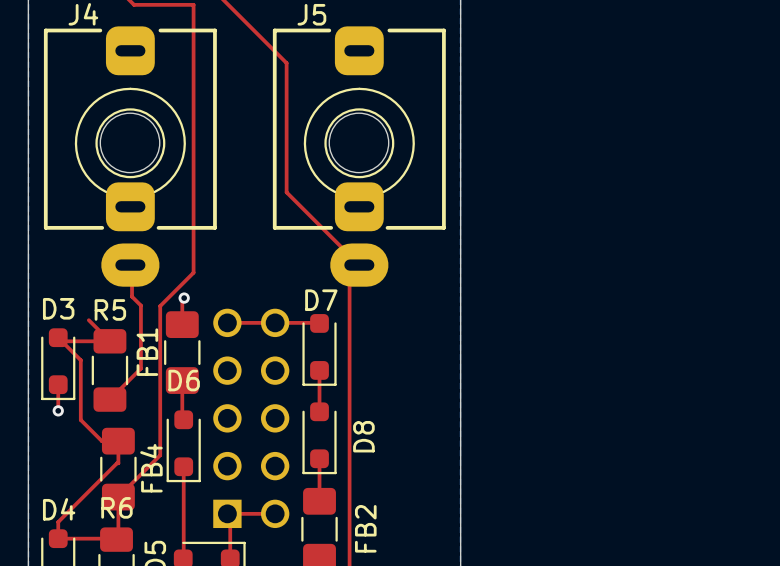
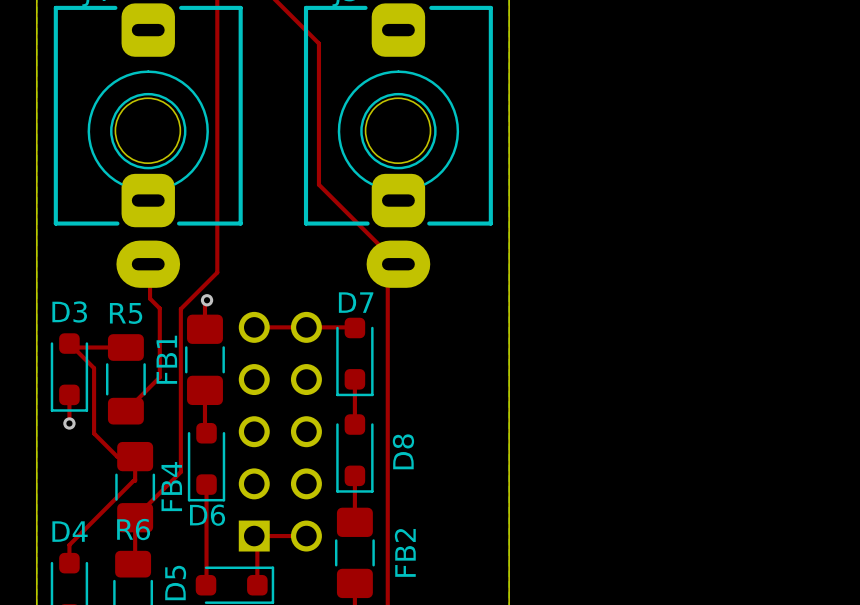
top track: (88, 320) (109, 341) -> none
D6 name position: D6 (184, 380) -> D6 (207, 515)
top track: (58, 538) (115, 538) -> none

